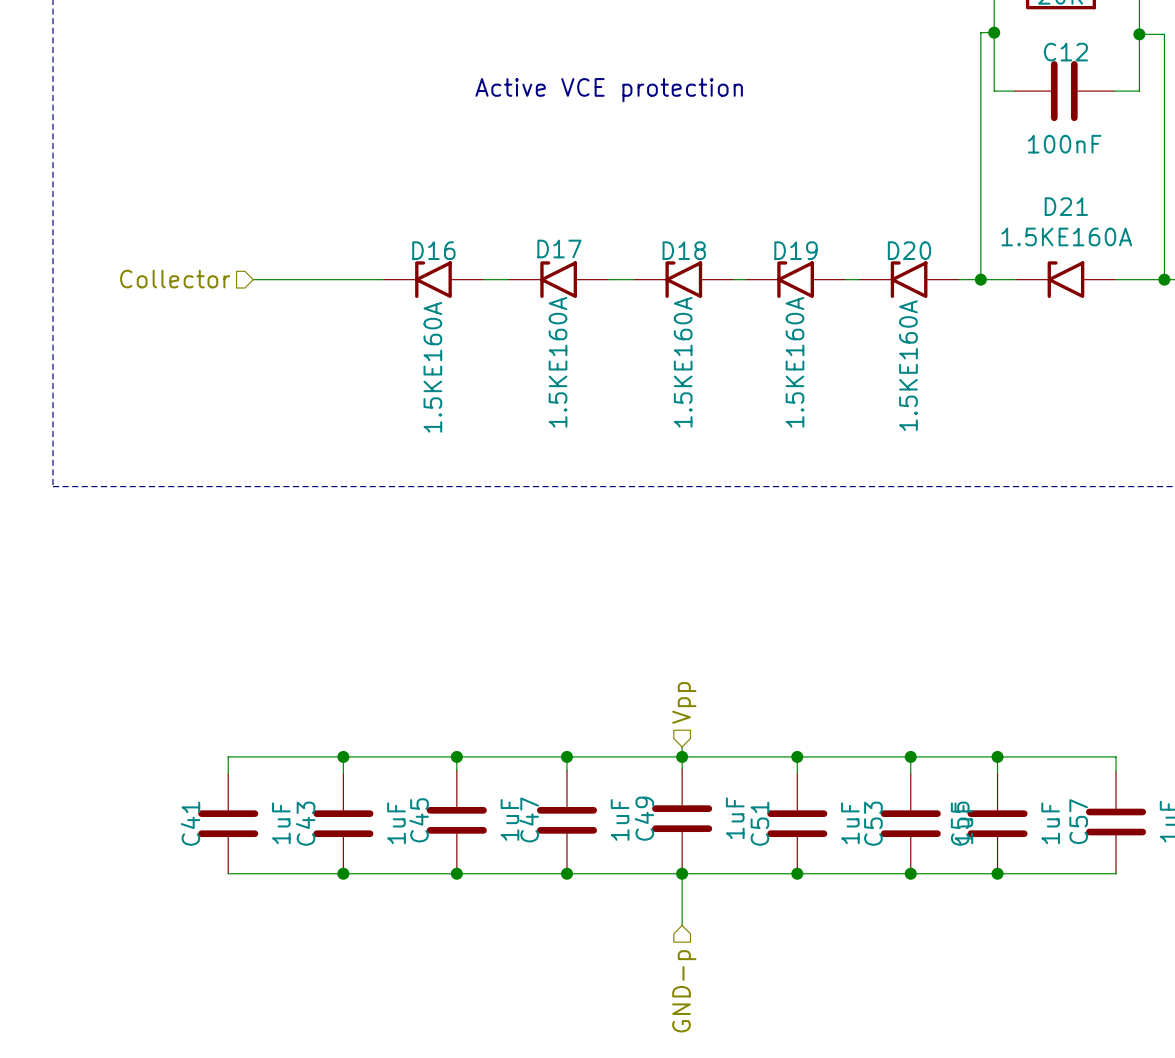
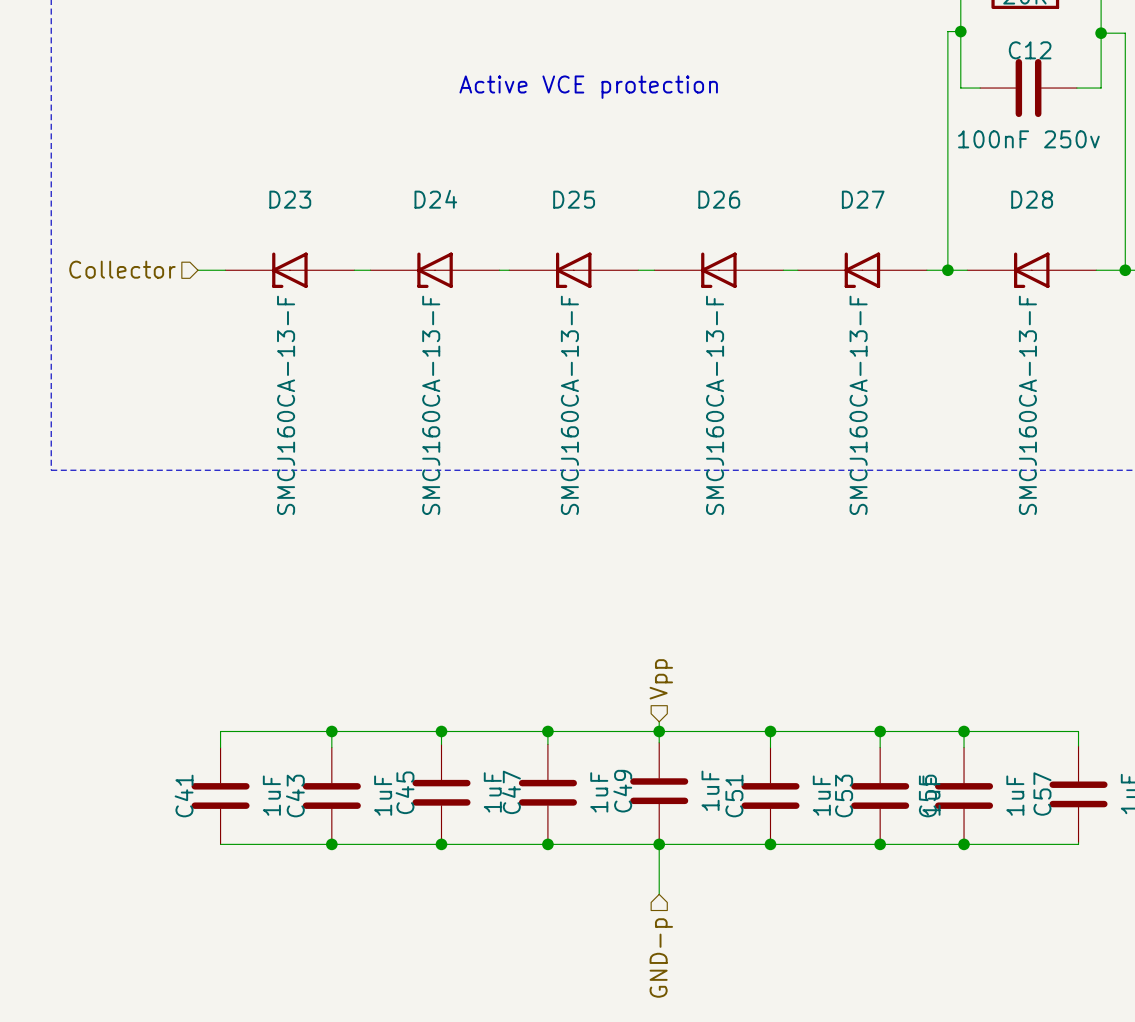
C12 value: 100nF (1064, 144) -> 100nF 250v (1028, 139)
hierarchical label position: Collector (175, 279) -> Collector (122, 269)
wire: none -> (197, 270) (225, 270)
D23: none -> SMCJ160CA-13-F (289, 270)
D16: 1.5KE160A (433, 279) -> none
D24: none -> SMCJ160CA-13-F (435, 270)
D17: 1.5KE160A (558, 279) -> none
D25: none -> SMCJ160CA-13-F (573, 270)
D18: 1.5KE160A (683, 279) -> none
D26: none -> SMCJ160CA-13-F (718, 270)
D19: 1.5KE160A (795, 279) -> none
D27: none -> SMCJ160CA-13-F (862, 270)
D20: 1.5KE160A (909, 279) -> none
D21: 1.5KE160A (1065, 279) -> none
D28: none -> SMCJ160CA-13-F (1031, 270)

